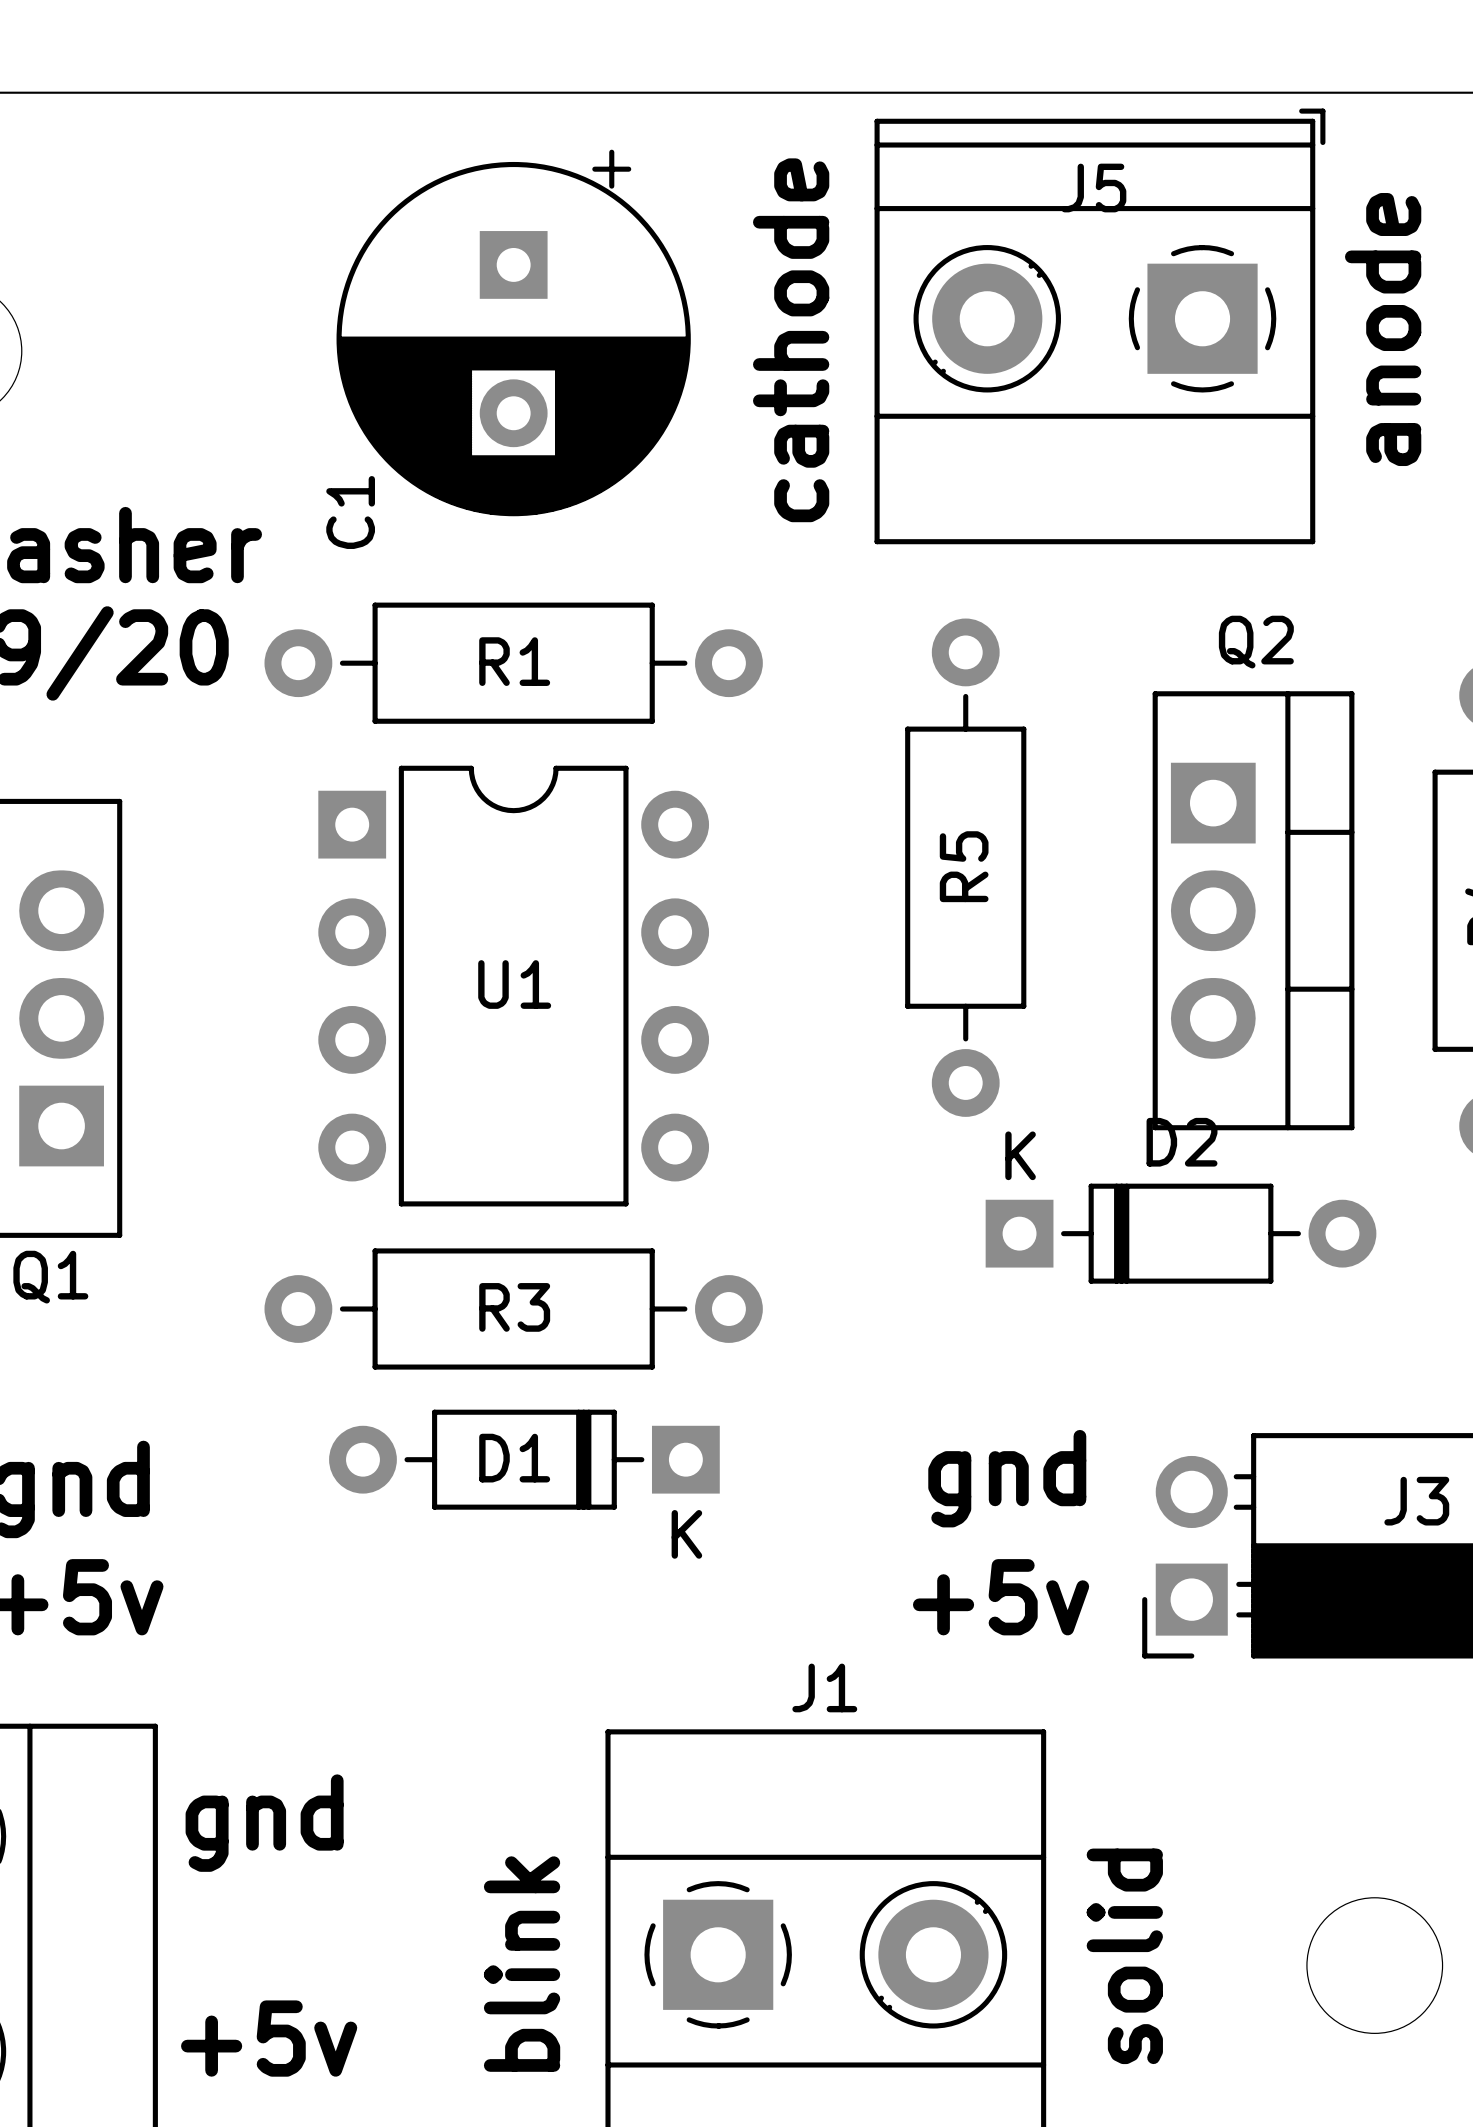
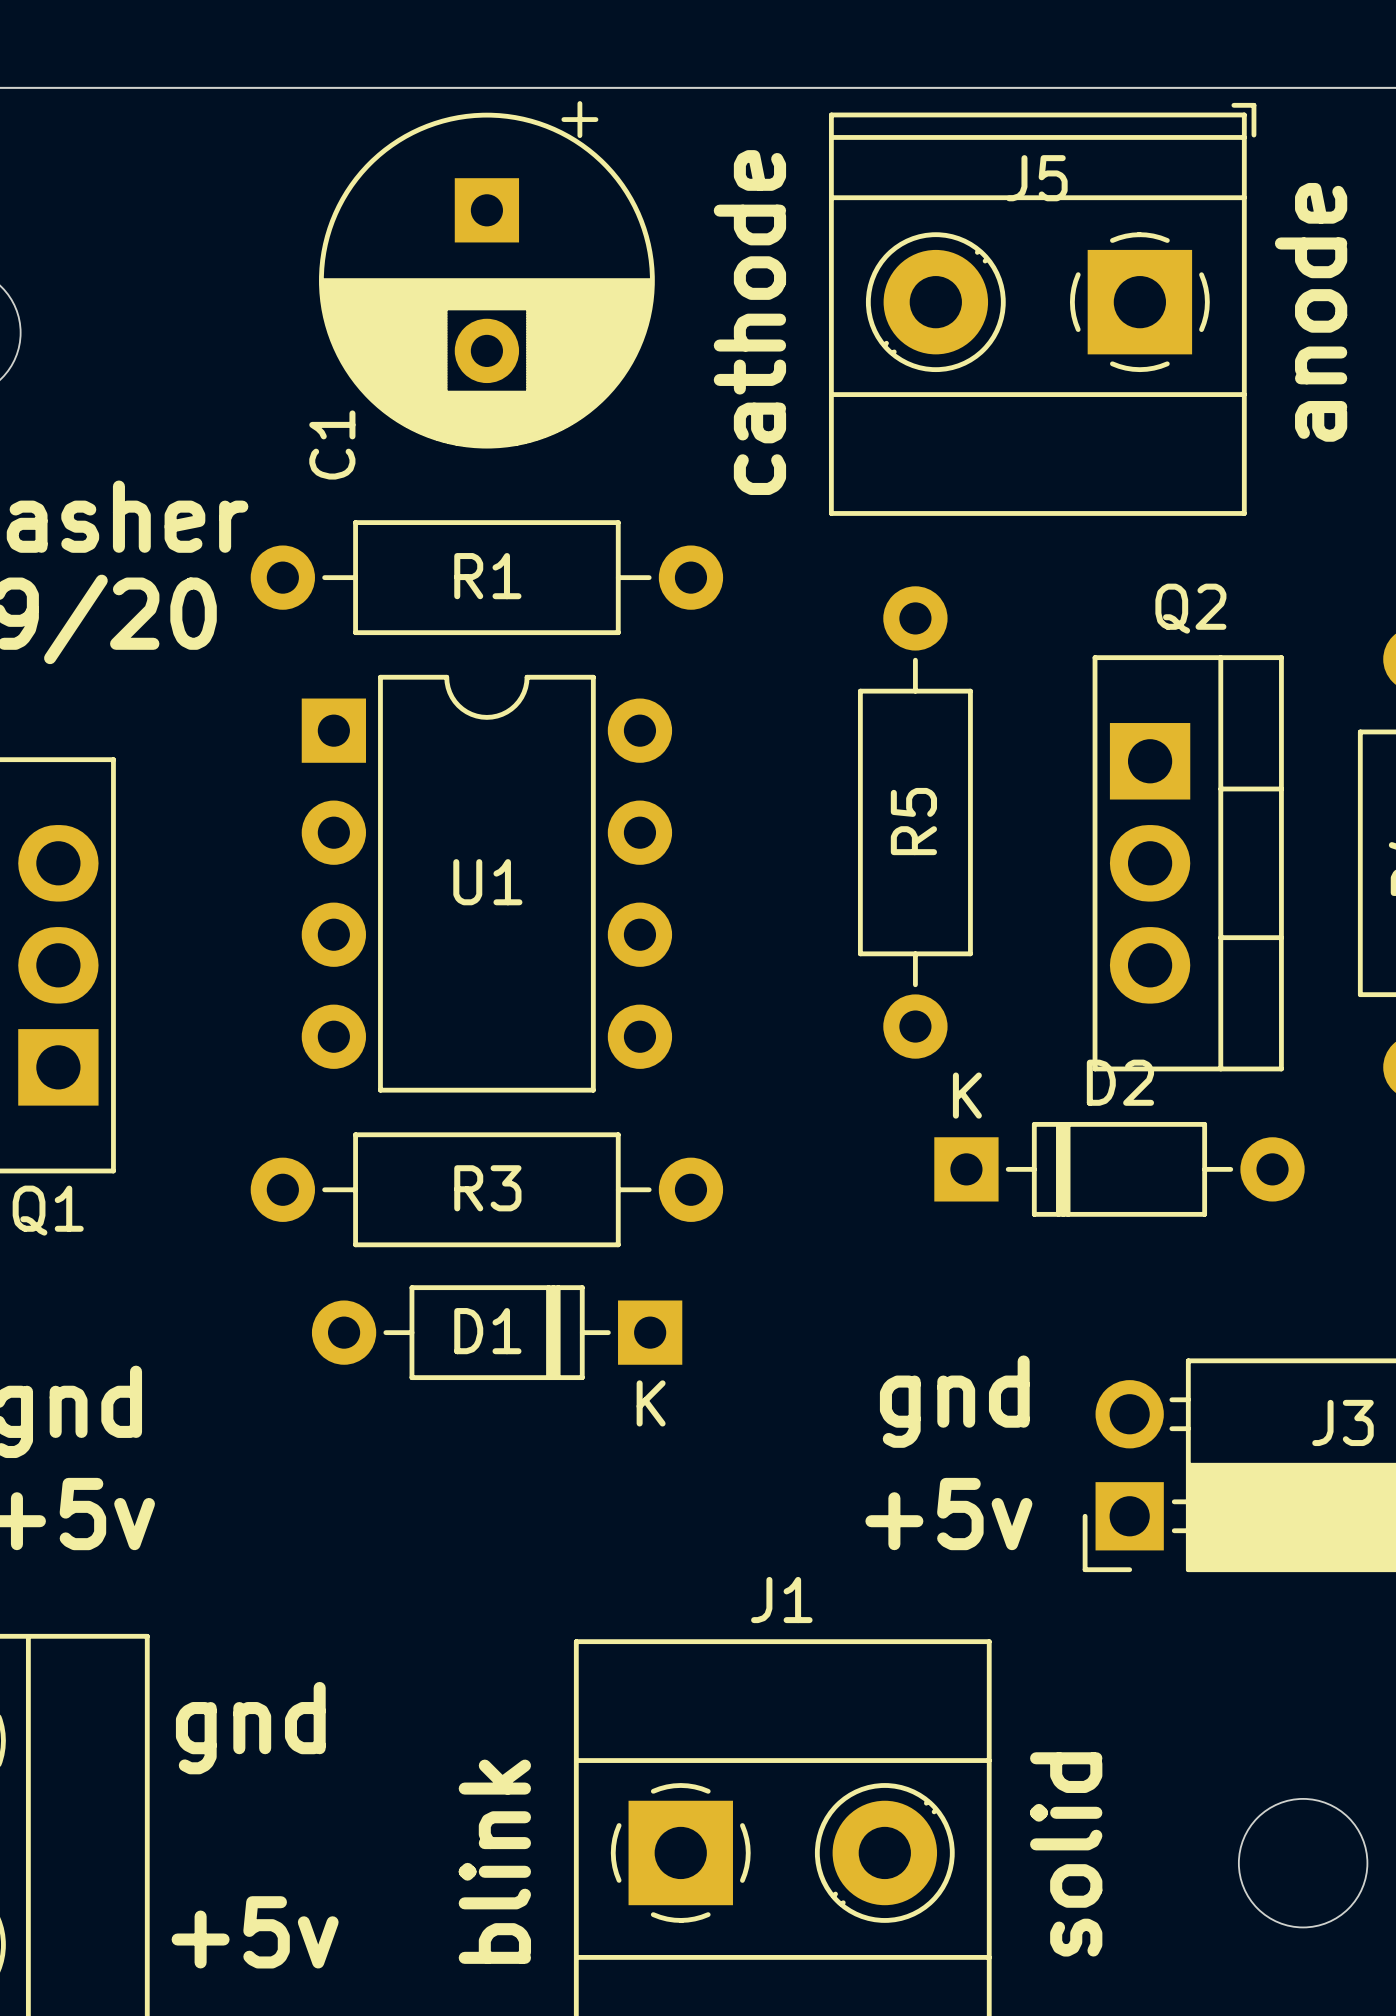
C1 position: (513, 332) -> (486, 274)
R1 position: (513, 663) -> (486, 577)
U1 position: (513, 986) -> (486, 883)
R3 position: (513, 1309) -> (486, 1189)
D1 position: (524, 1459) -> (497, 1332)

